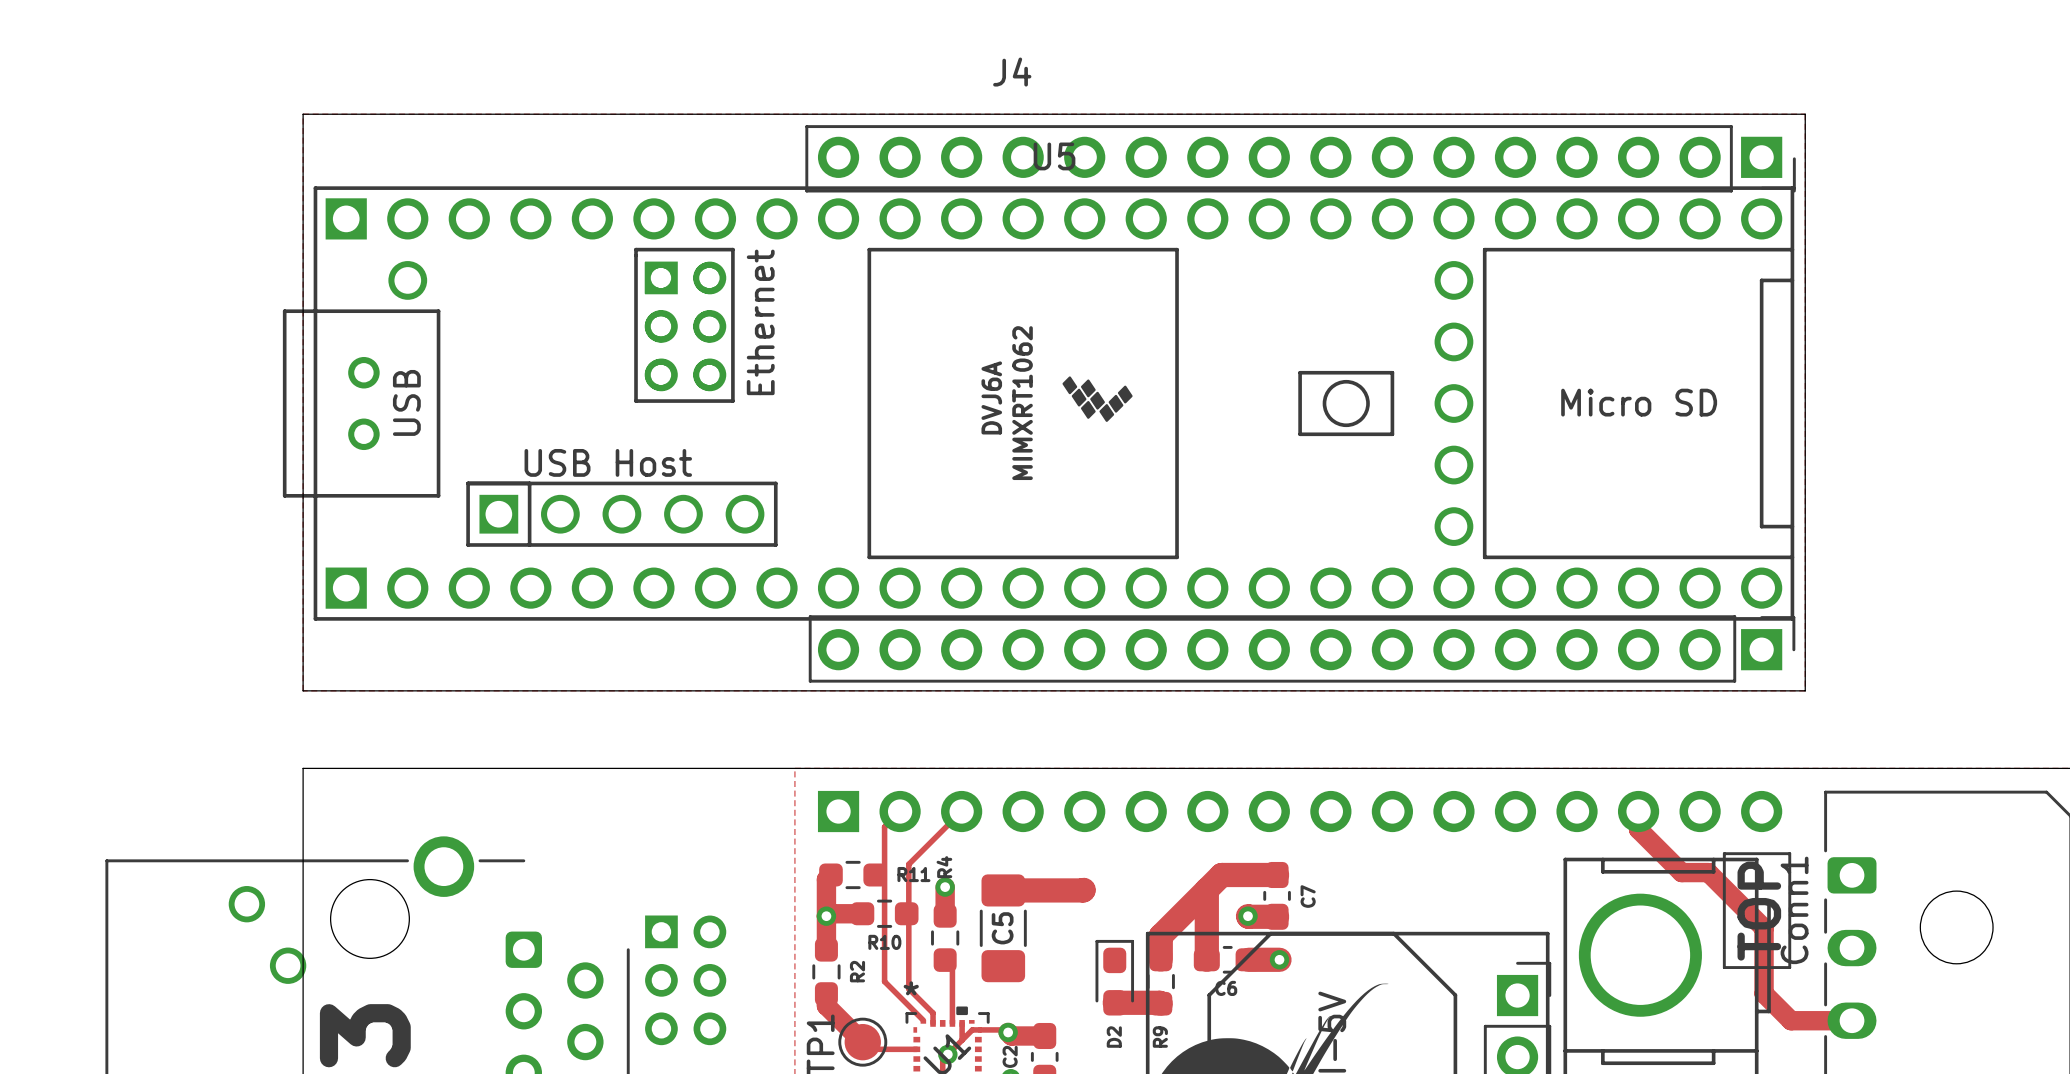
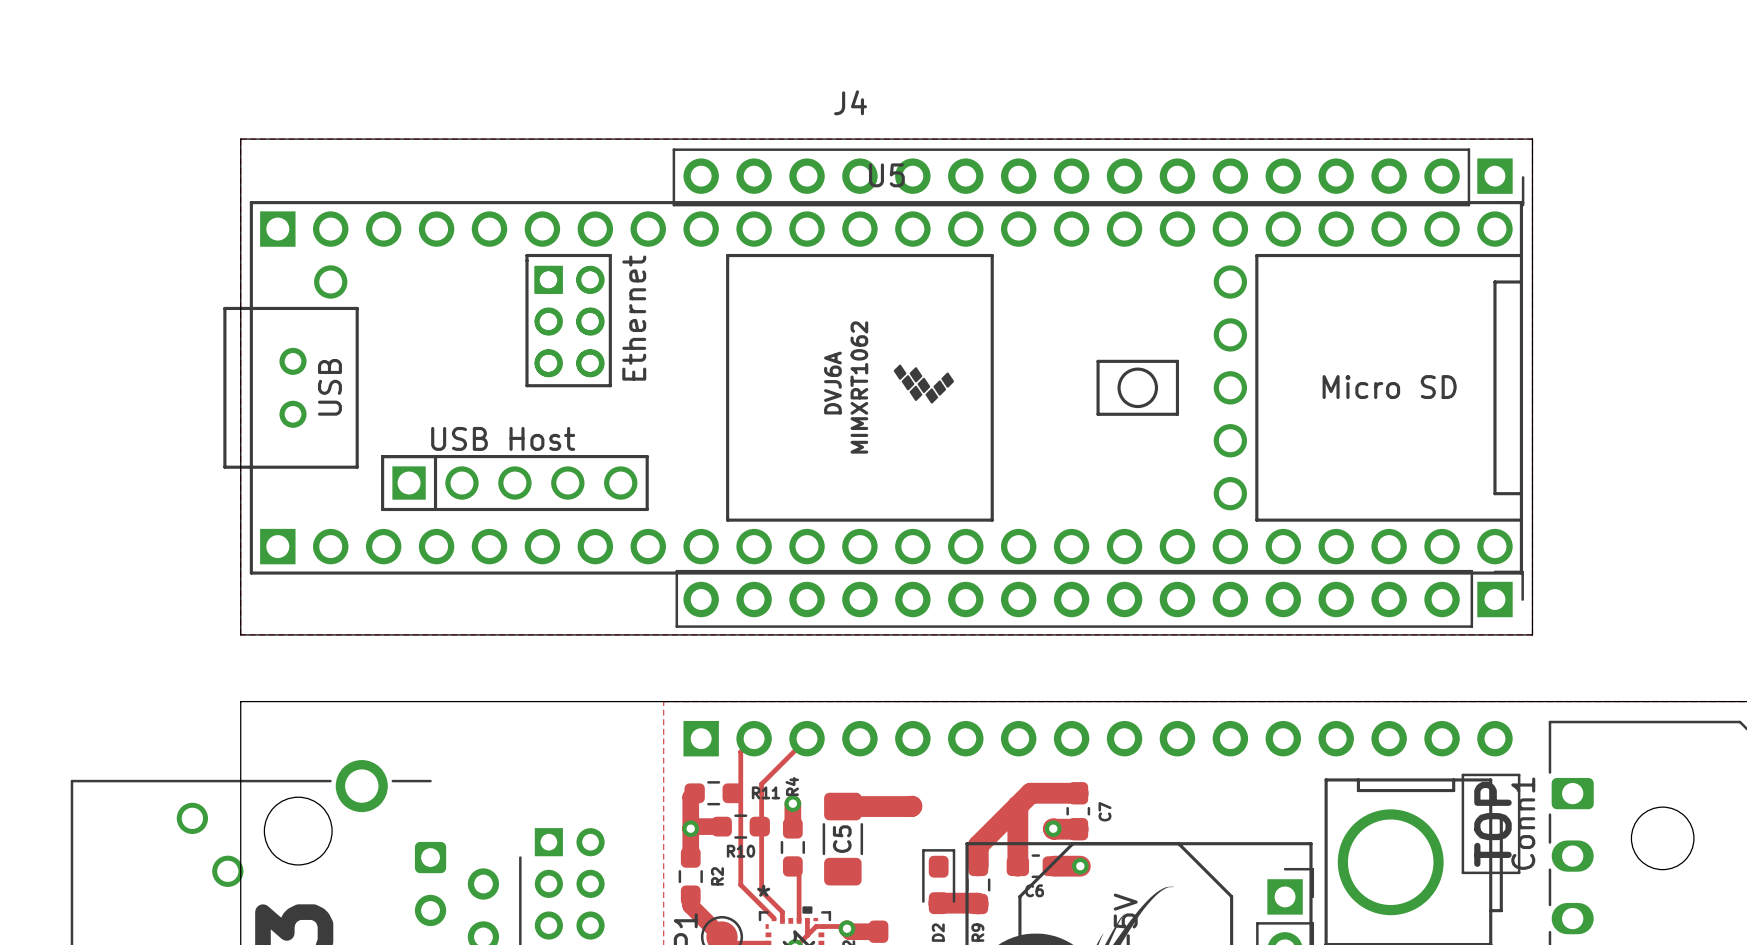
track: (1638, 811) (1638, 829) (1681, 872) (1708, 872) (1764, 928) (1764, 993) (1791, 1020) (1852, 1020) -> none

